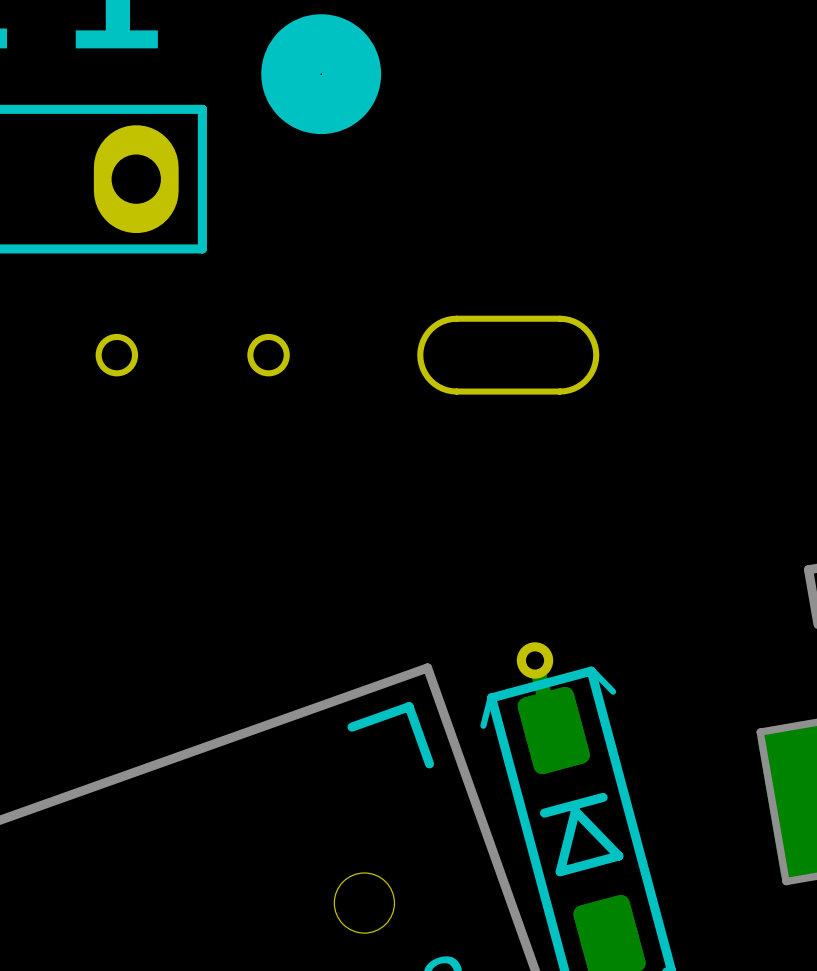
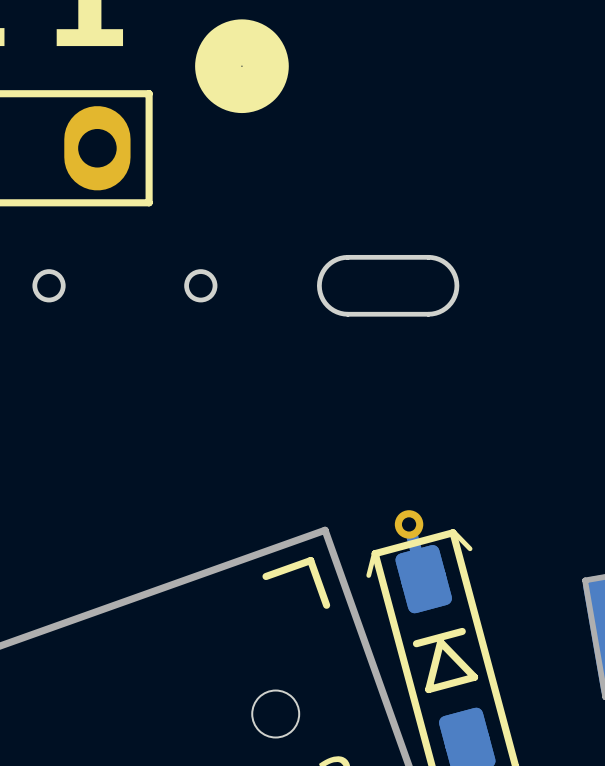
round board edge position: (116, 355) -> (49, 285)

